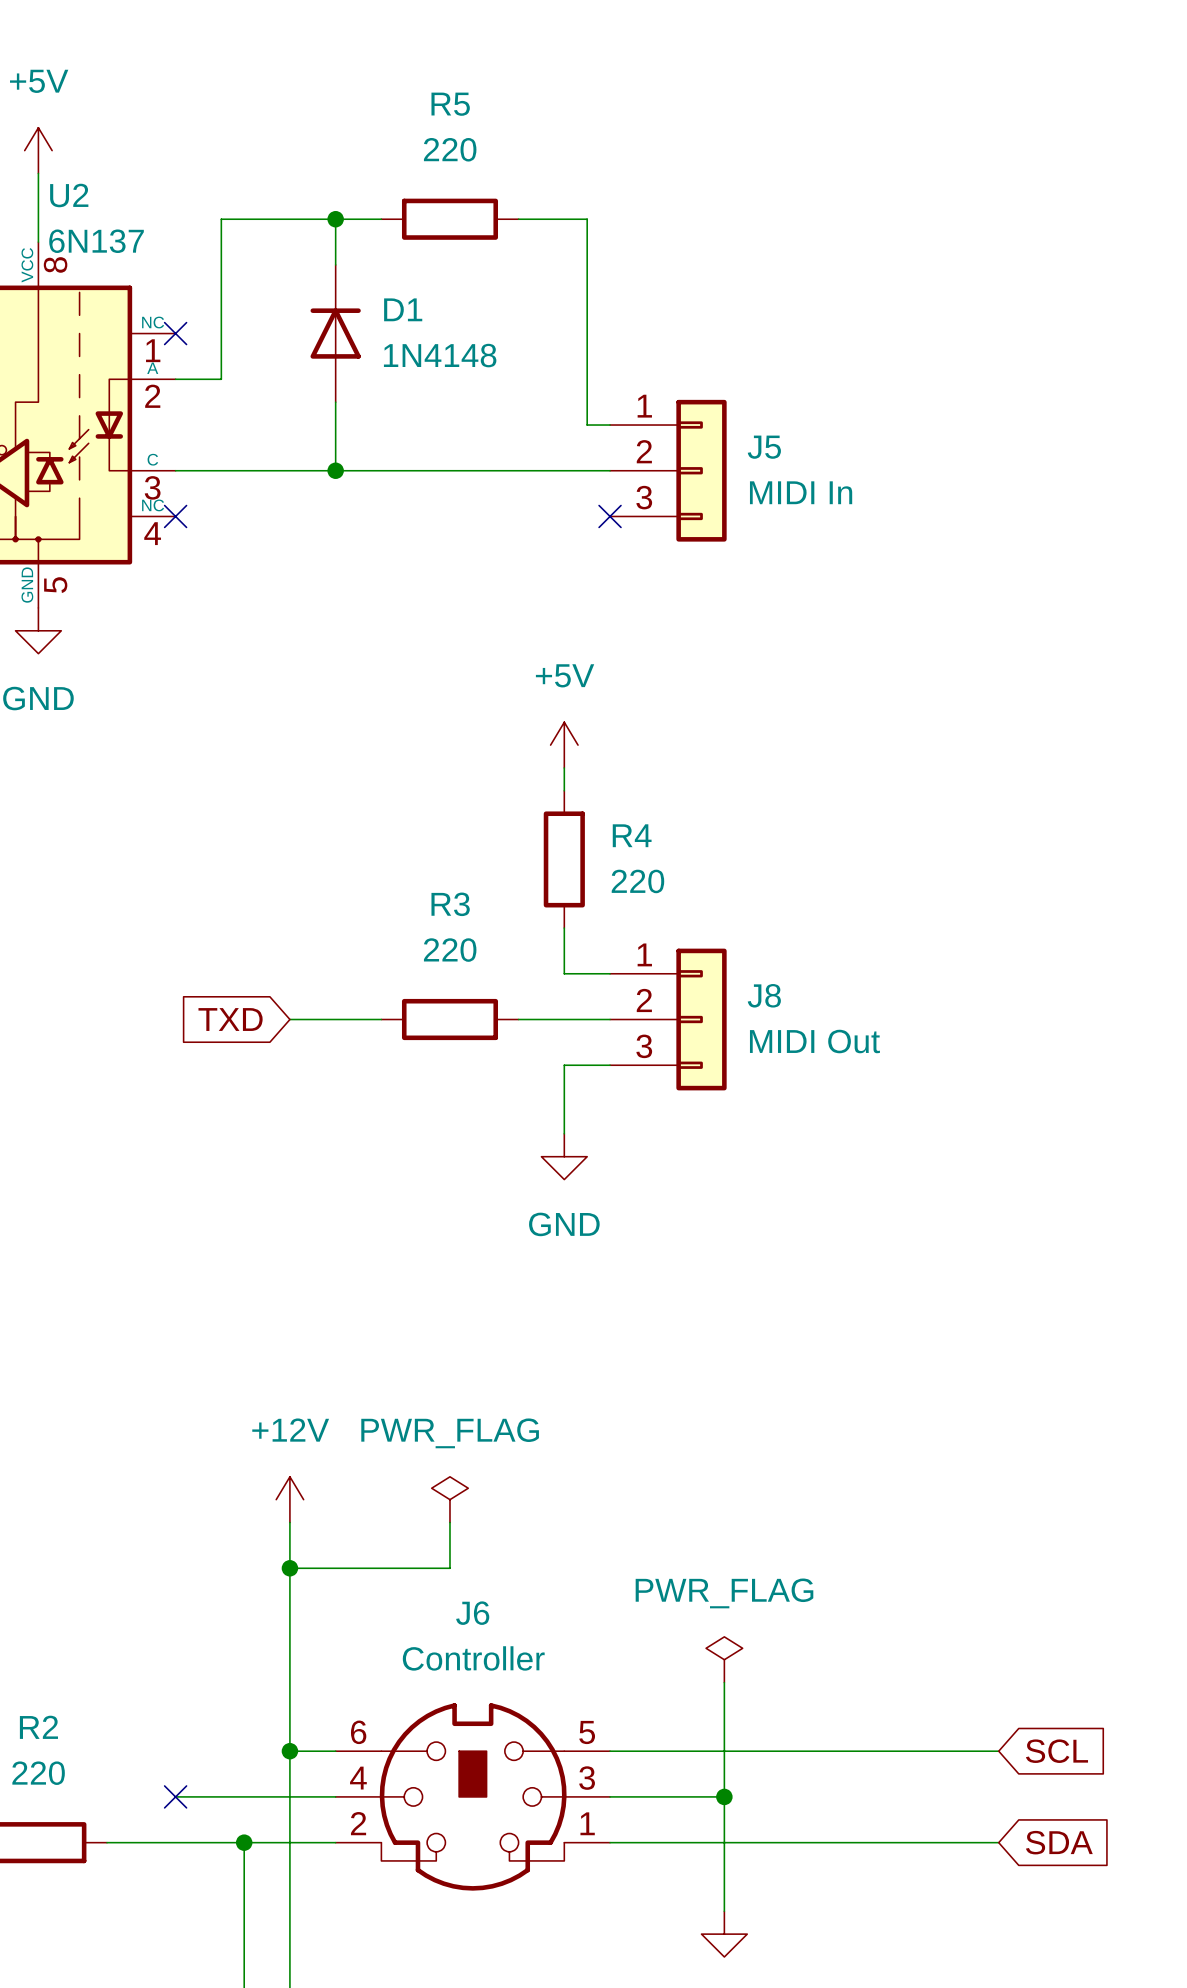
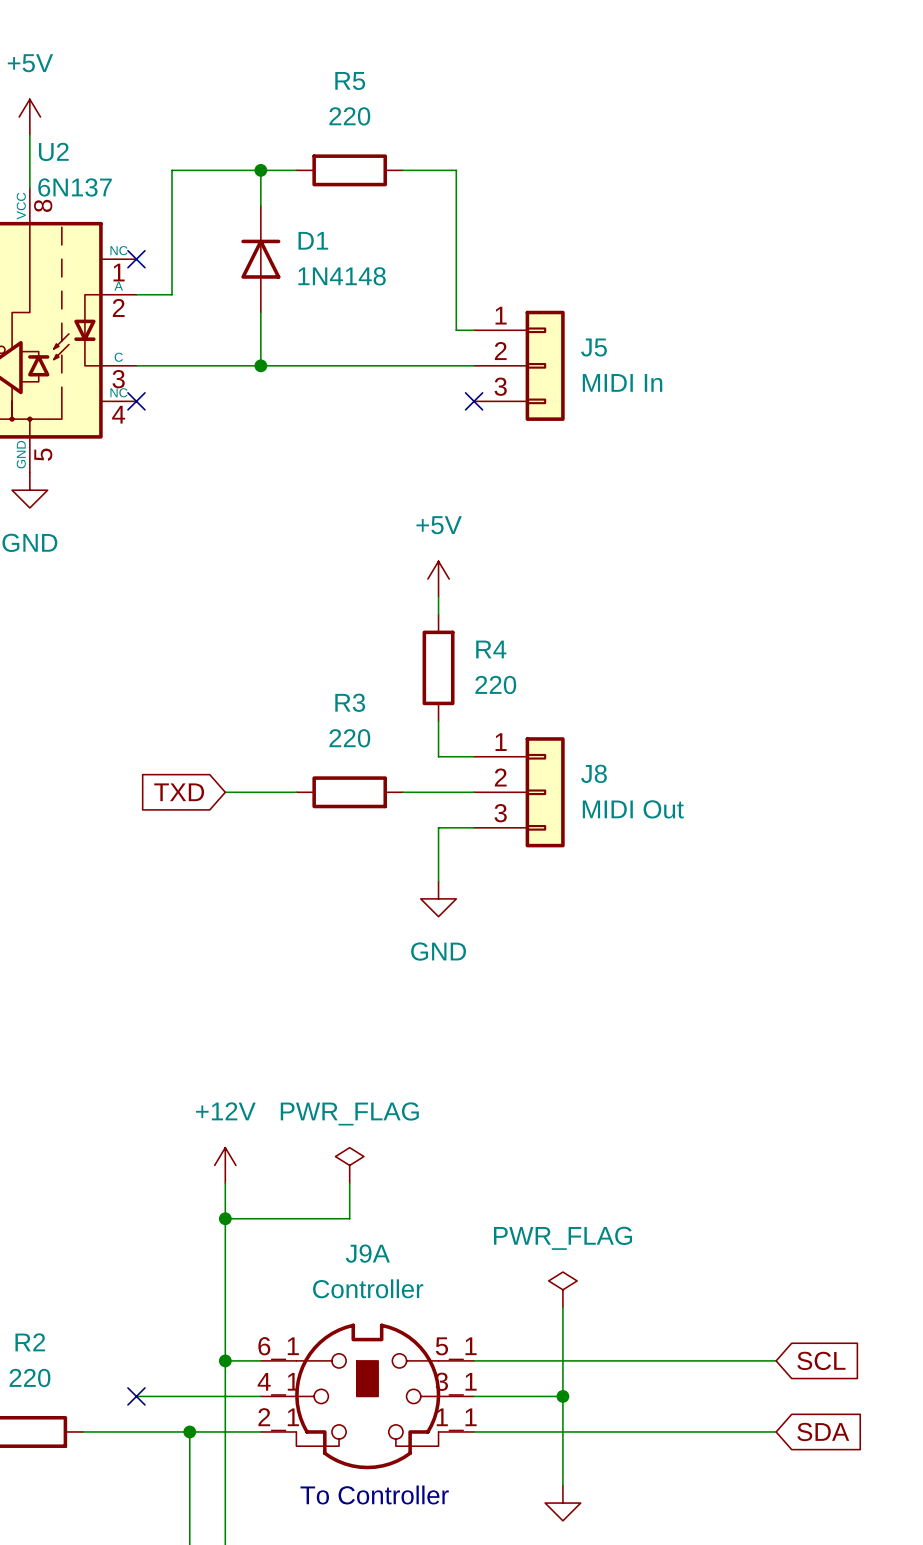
J6 name: J6 (472, 1613) -> J9A (367, 1253)
J6 pin number: 6 (358, 1732) -> 6_1 (278, 1348)
J6 pin number: 5 (587, 1732) -> 5_1 (456, 1348)
J6 pin number: 4 (358, 1778) -> 4_1 (278, 1384)
J6 pin number: 3 (587, 1778) -> 3_1 (456, 1384)
J6 pin number: 2 (358, 1823) -> 2_1 (278, 1419)
J6 pin number: 1 (587, 1823) -> 1_1 (456, 1419)
text: none -> To Controller (374, 1494)

